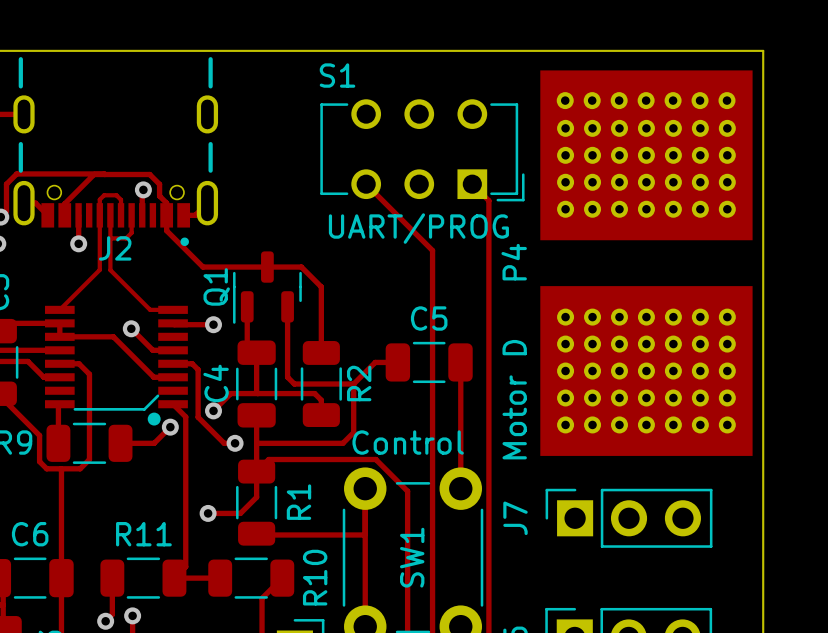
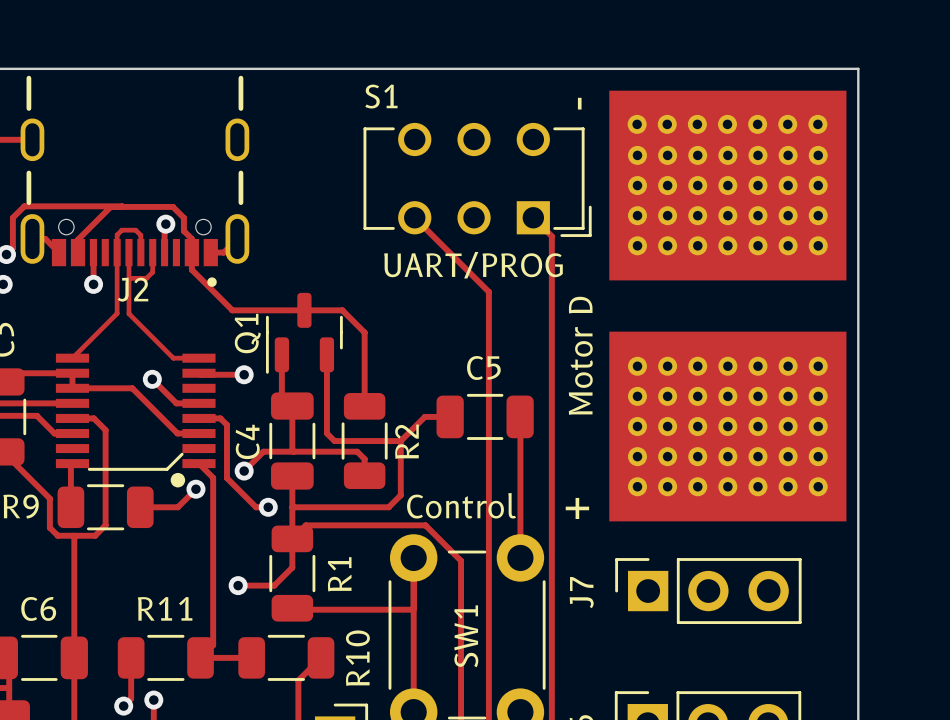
text: none -> - (579, 103)
P4 name: P4 (514, 262) -> none
text position: Motor D (514, 399) -> Motor D (580, 355)
text: none -> + (577, 508)

